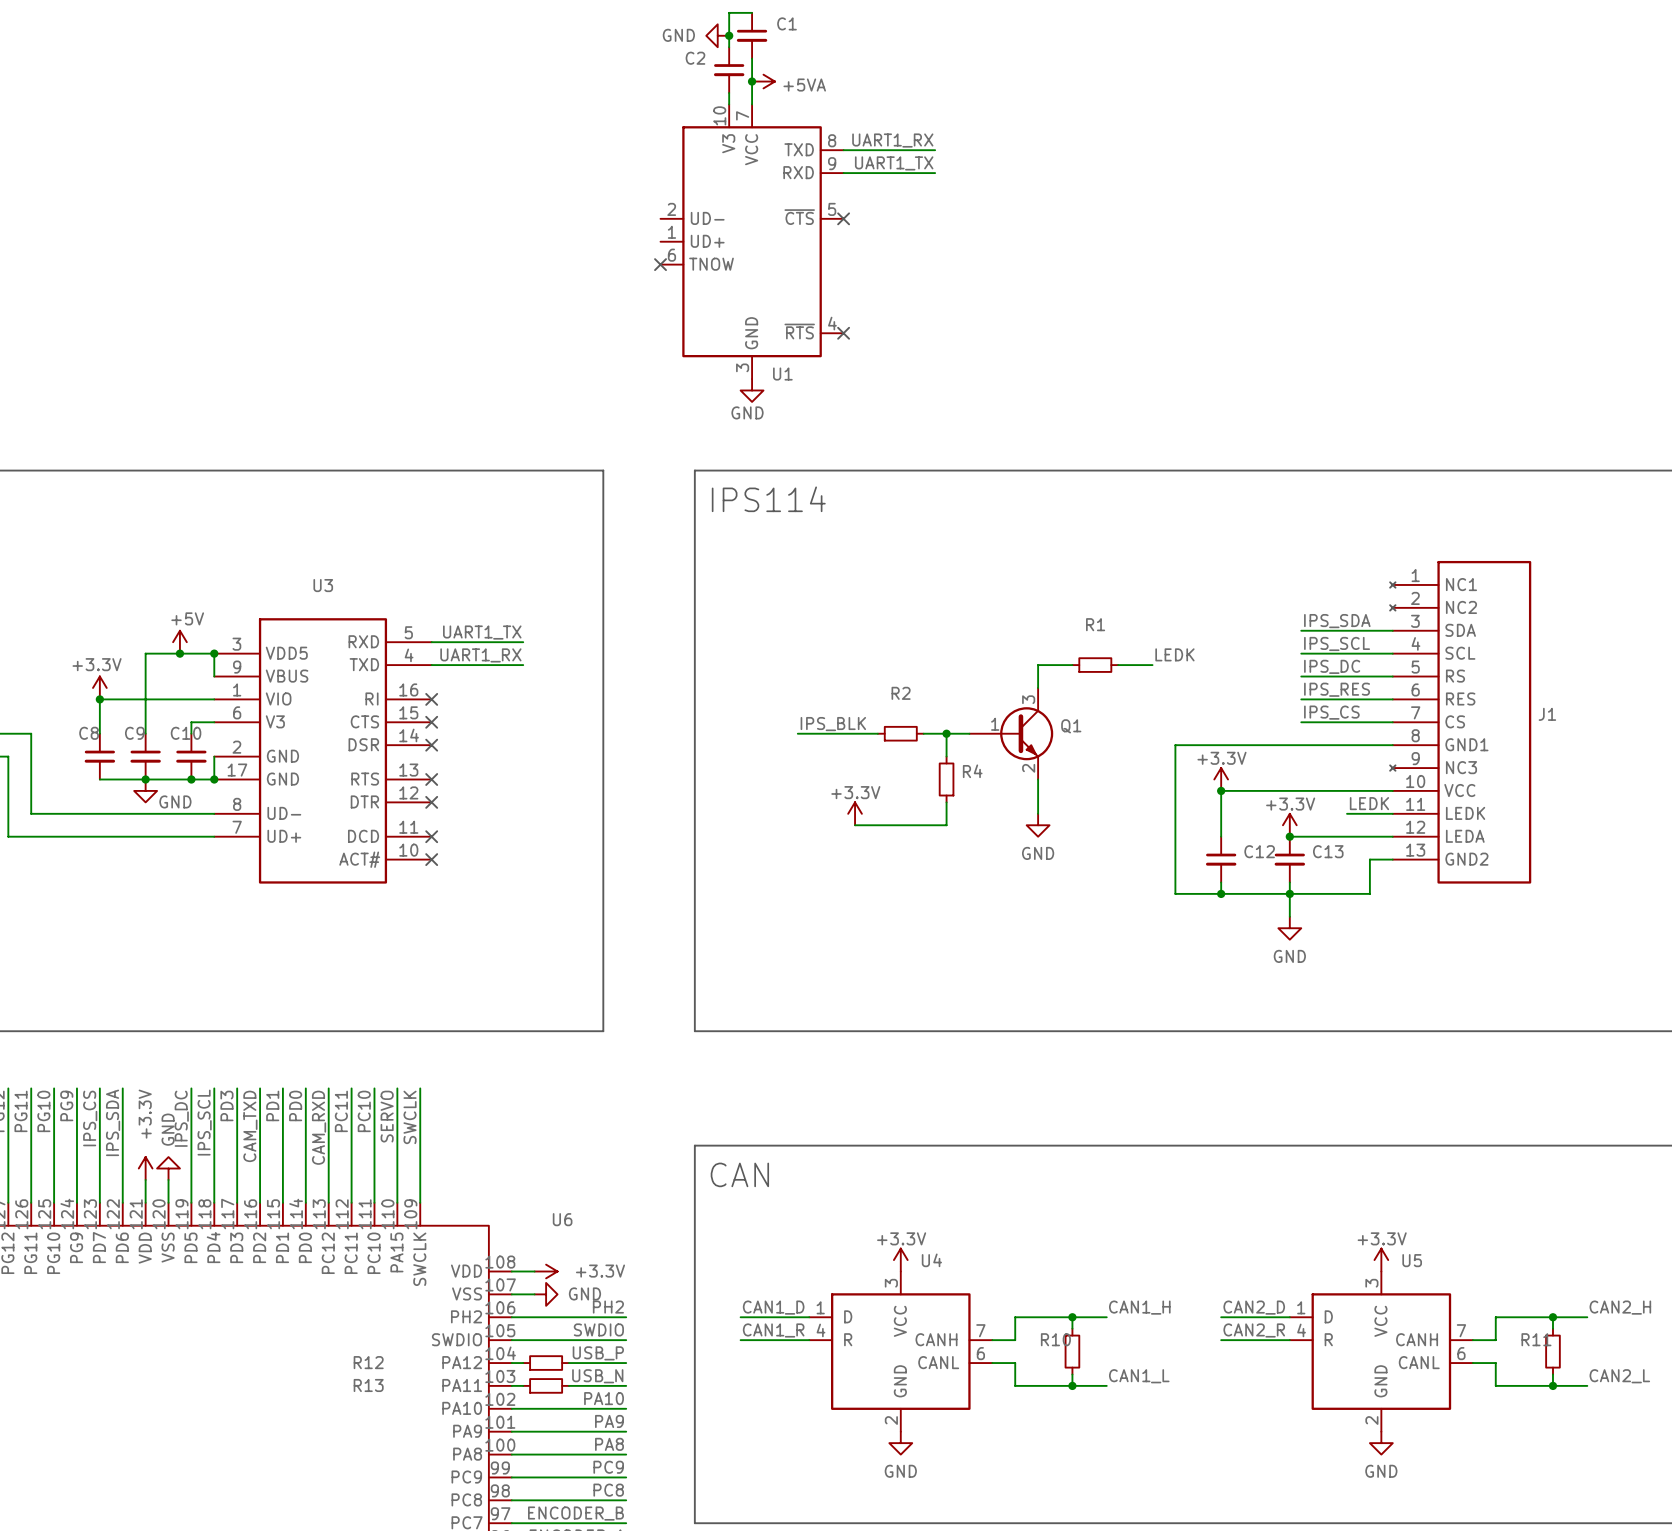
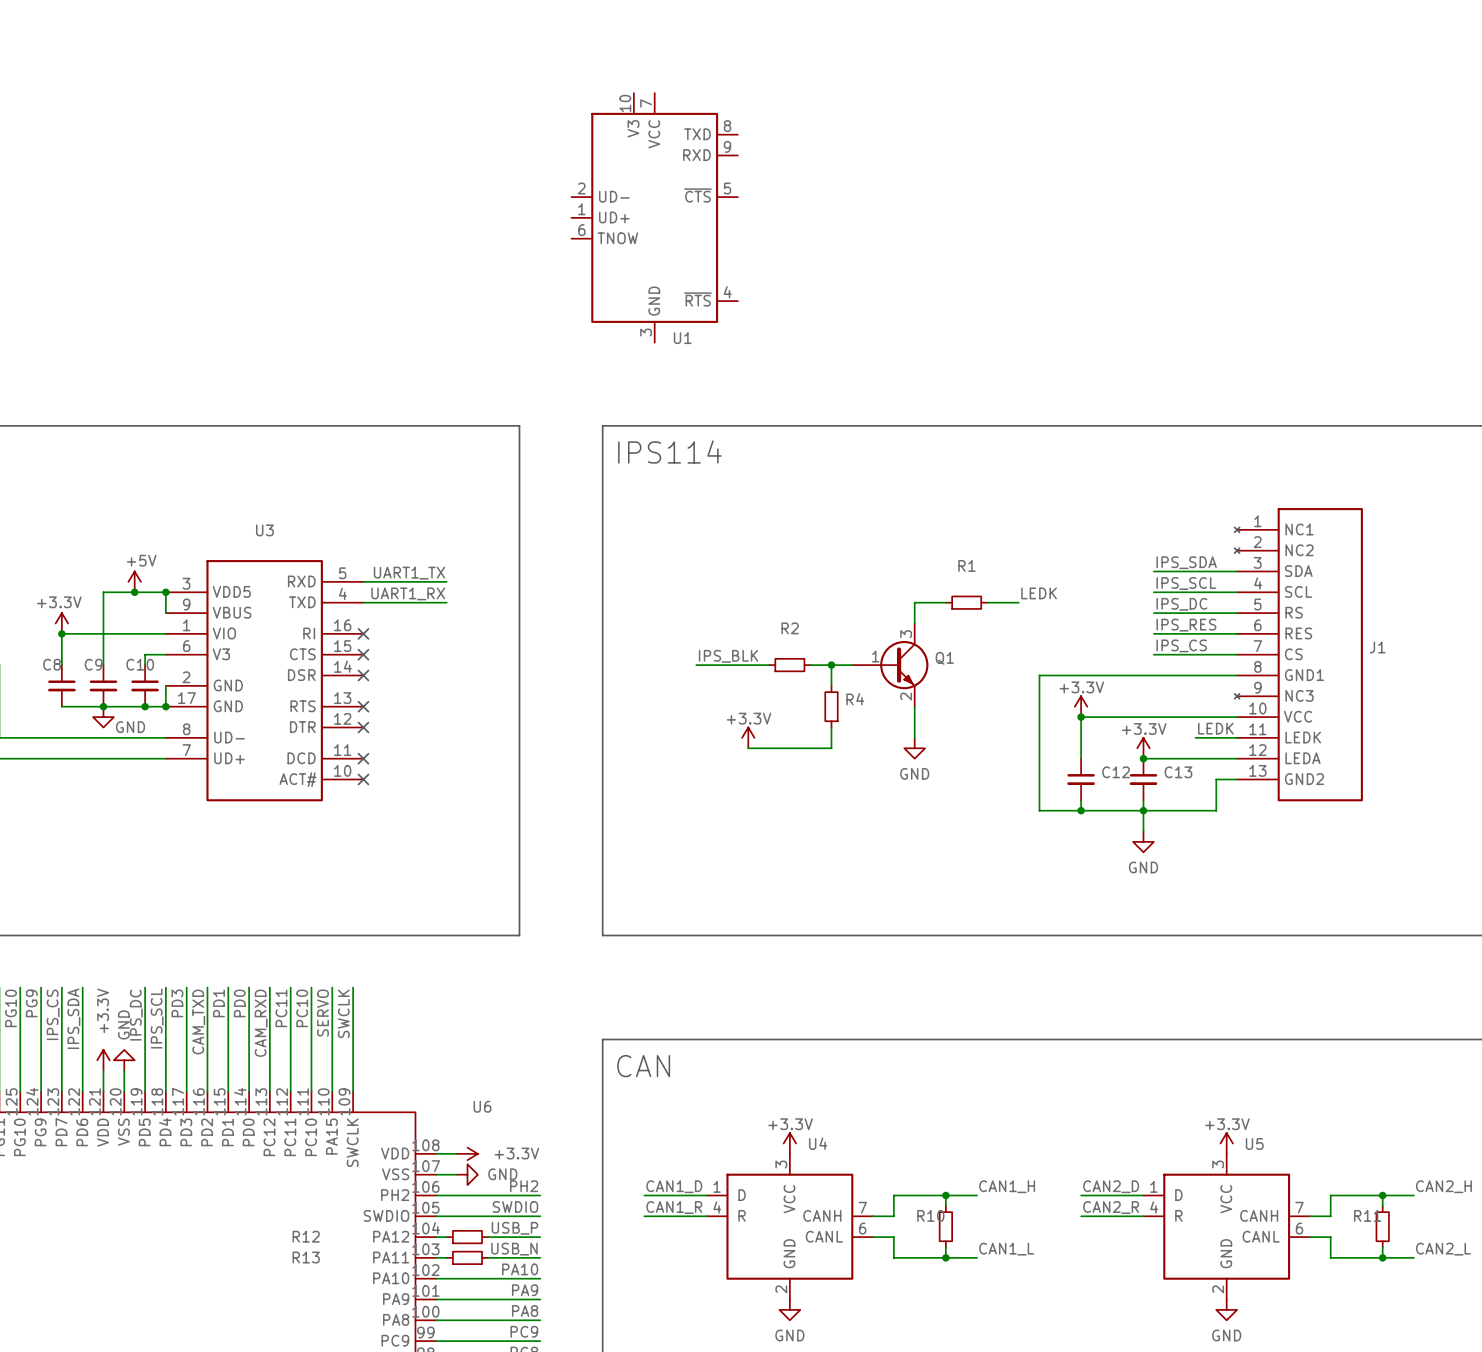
wire: (752, 12) (729, 12) (729, 47) -> none
power symbol: GND (717, 35) -> none
junction: (729, 35) -> none
C1: (752, 35) -> none
wire: (752, 58) (752, 104) -> none
C2: (729, 70) -> none
junction: (752, 81) -> none
power symbol: +5VA (763, 81) -> none
wire: (729, 92) (729, 104) -> none
label: UART1_RX (892, 140) -> none
wire: (843, 150) (935, 150) -> none
label: UART1_TX (894, 163) -> none
wire: (843, 173) (935, 173) -> none
no-connect mark: (843, 218) -> none
no-connect mark: (660, 264) -> none
no-connect mark: (843, 333) -> none
power symbol: GND (752, 390) -> none

